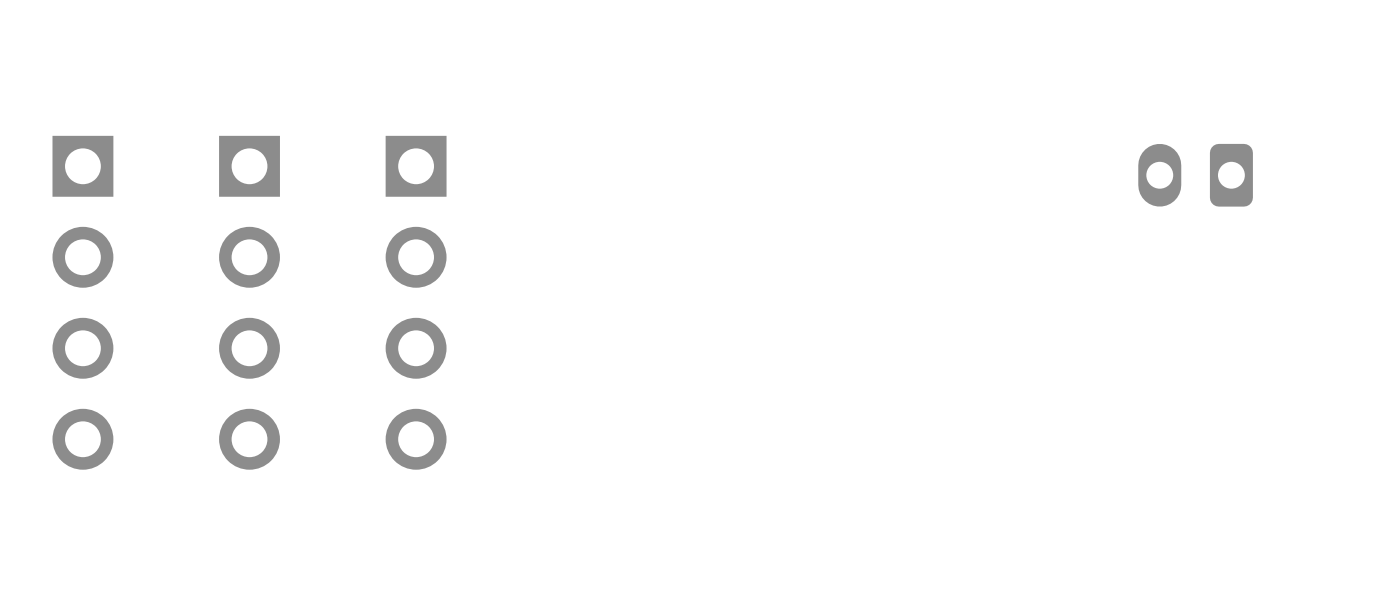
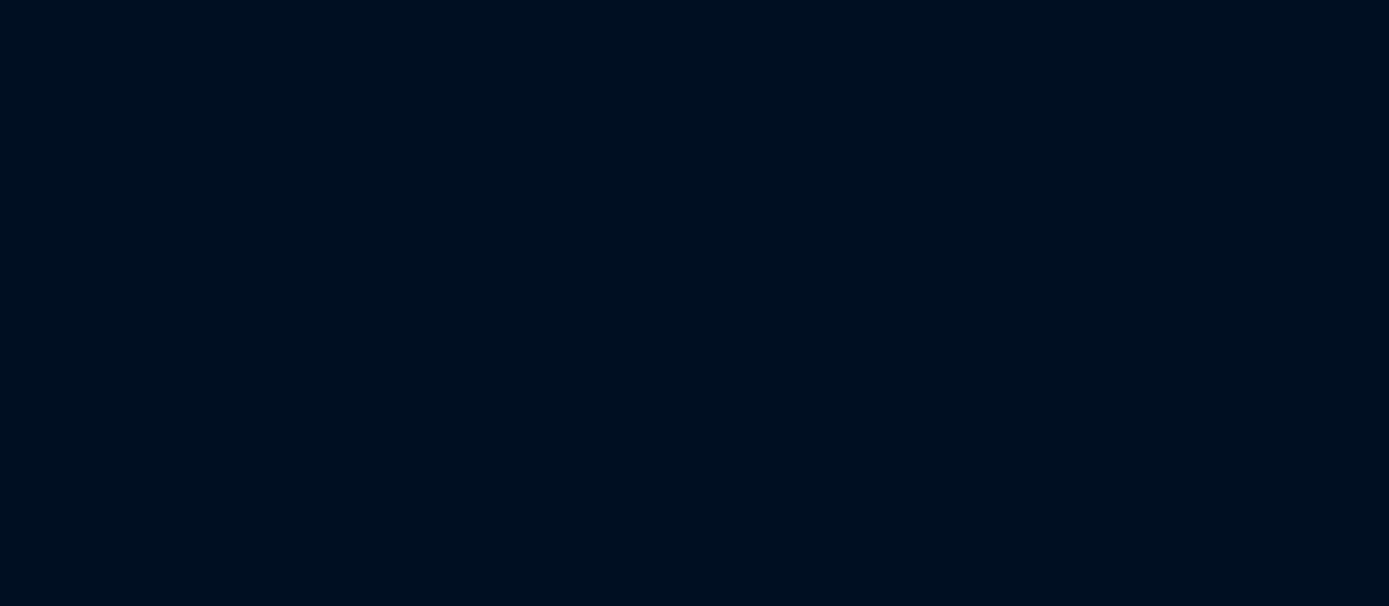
part: (1195, 175) -> none
part: (82, 302) -> none
part: (249, 302) -> none
part: (416, 302) -> none

